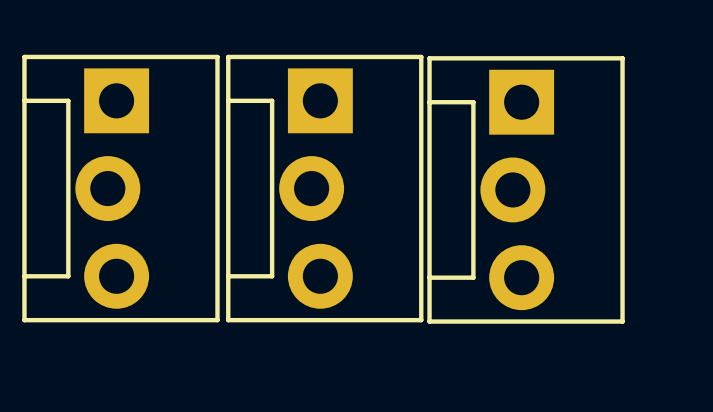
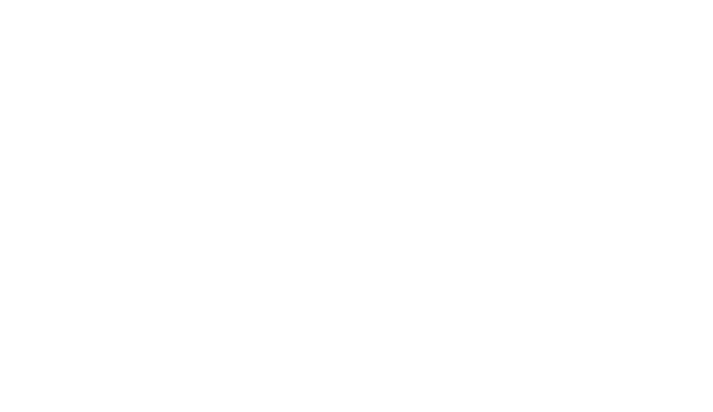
part: (120, 188) -> none
part: (324, 188) -> none
part: (526, 189) -> none

